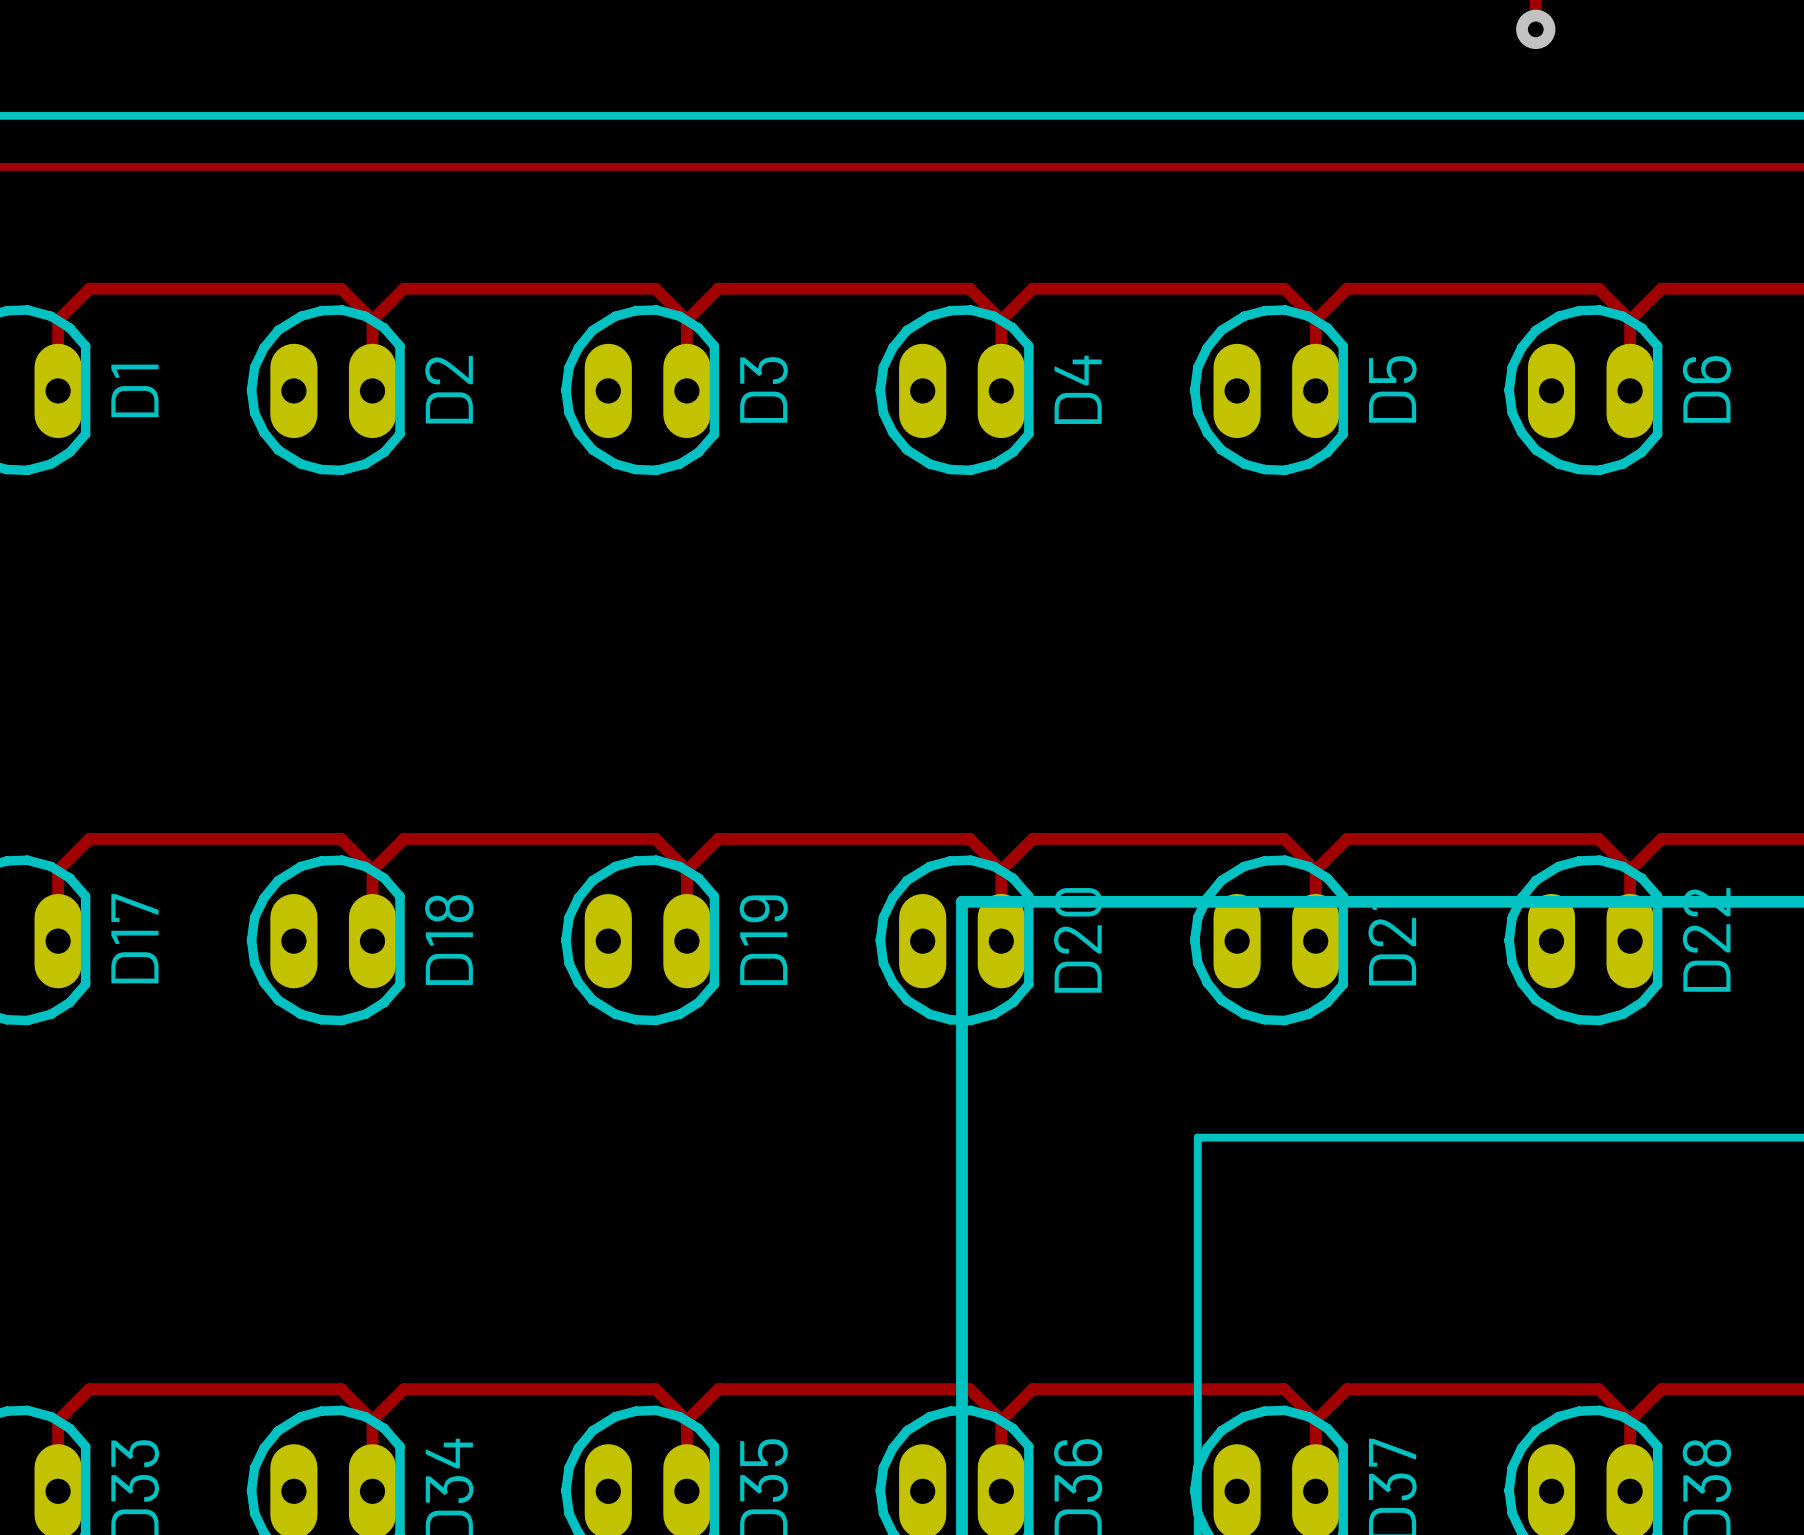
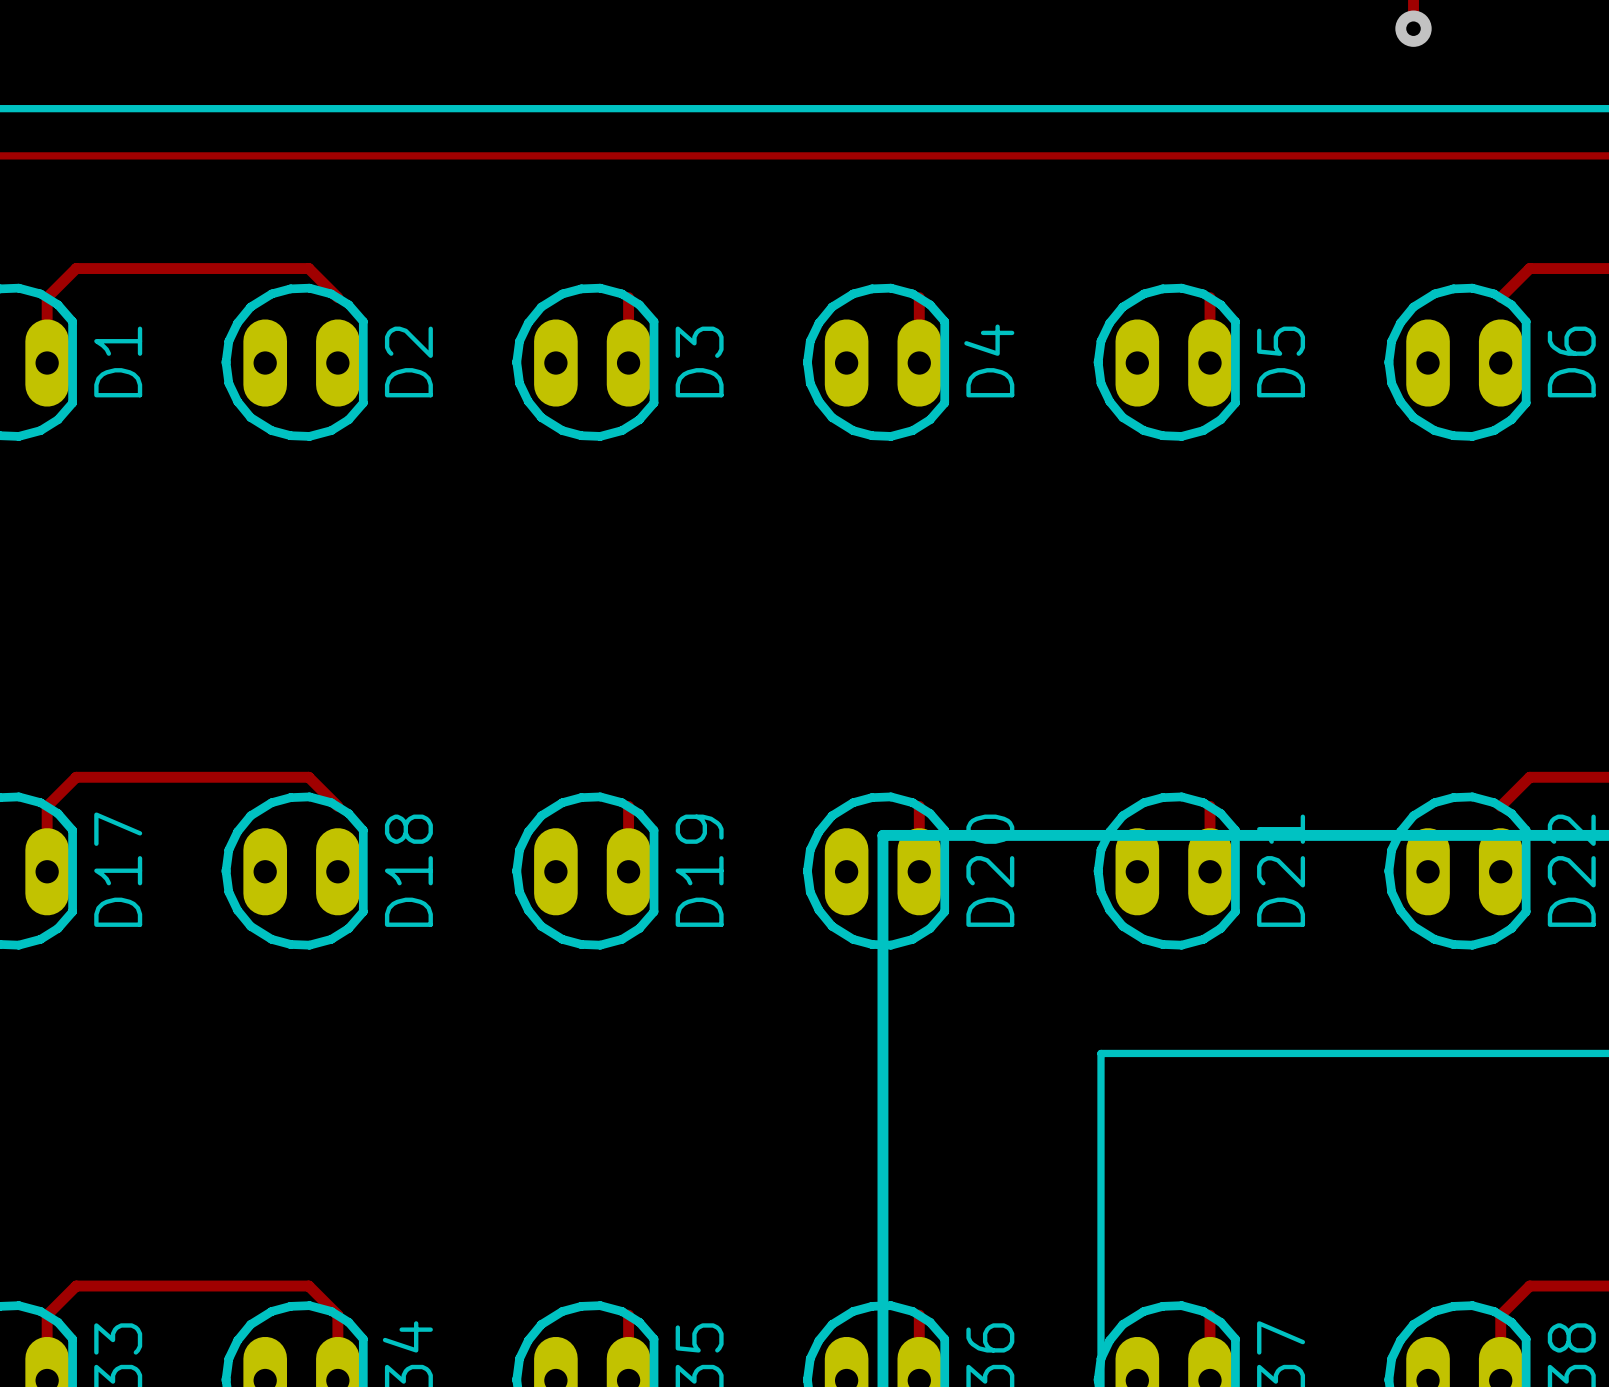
track: (372, 390) (372, 320) (403, 288) (655, 288) (686, 320) (718, 288) (969, 288) (1001, 320) (1032, 288) (1284, 288) (1315, 320) (1347, 288) (1598, 288) (1630, 320) (1630, 390) -> none
track: (372, 941) (372, 870) (403, 838) (655, 838) (686, 870) (718, 838) (969, 838) (1001, 870) (1032, 838) (1284, 838) (1315, 870) (1347, 838) (1598, 838) (1630, 870) (1630, 941) -> none
track: (372, 1420) (403, 1389) (655, 1389) (686, 1420) (718, 1389) (969, 1389) (1001, 1420) (1032, 1389) (1284, 1389) (1315, 1420) (1347, 1389) (1598, 1389) (1630, 1420) -> none

